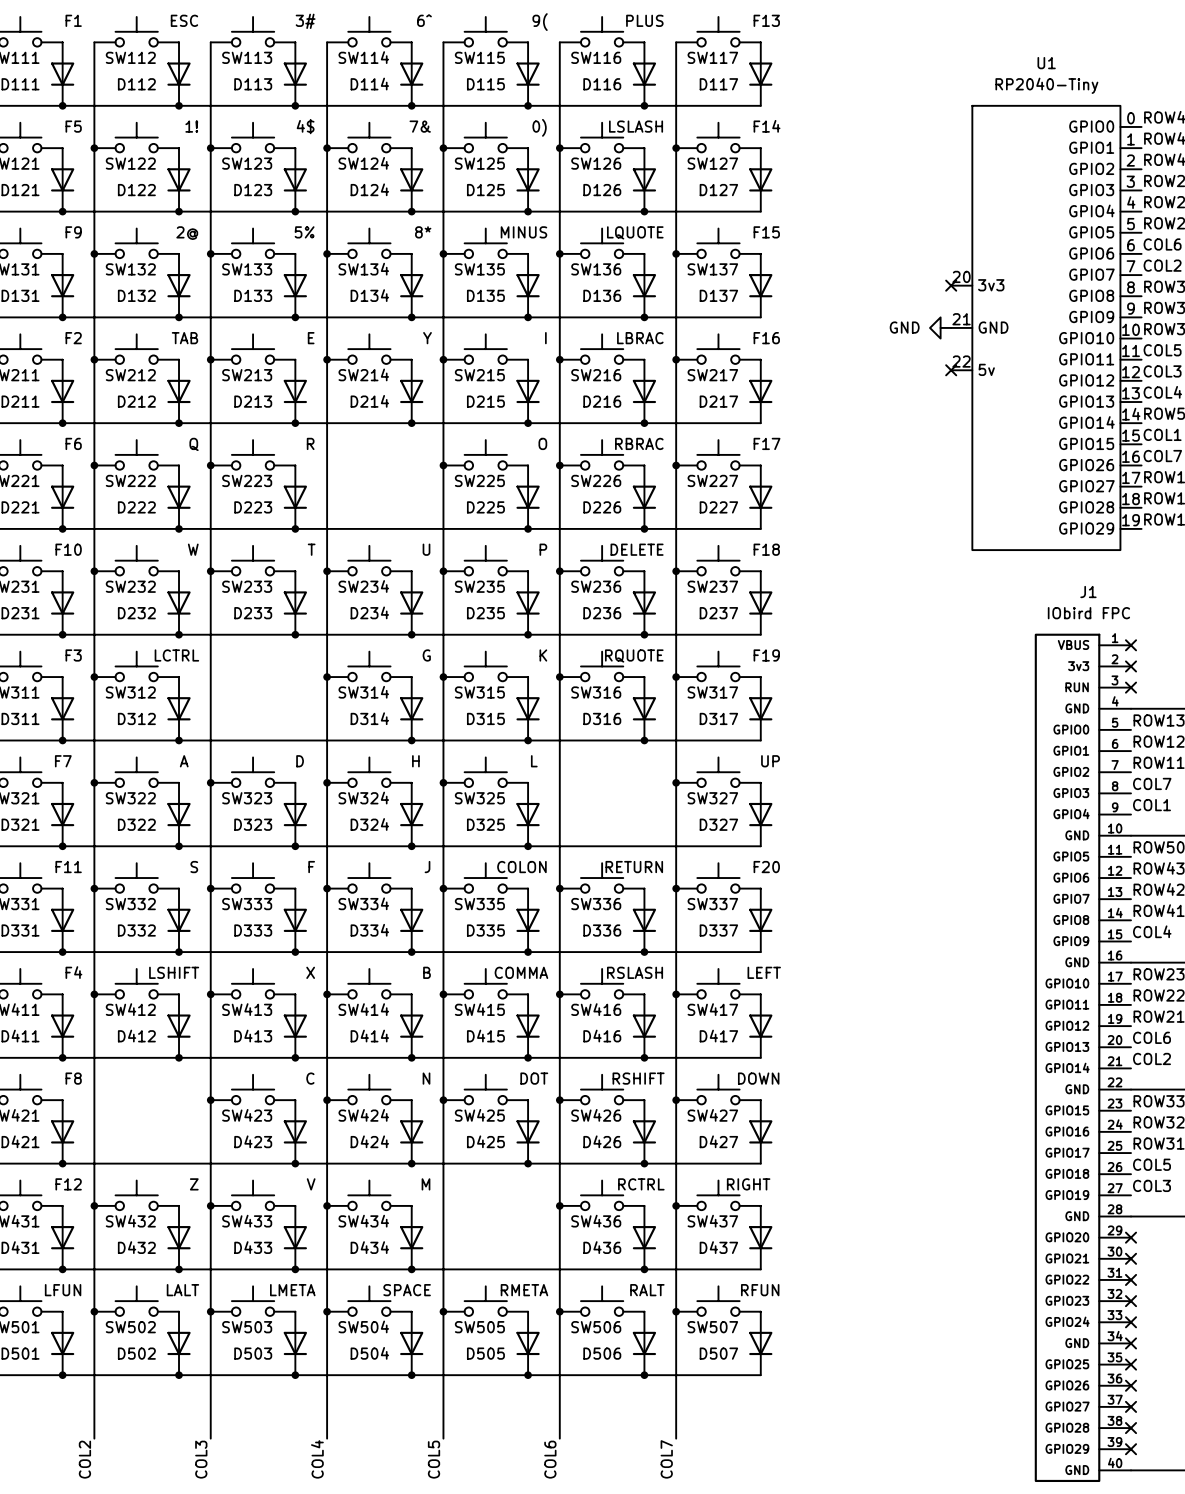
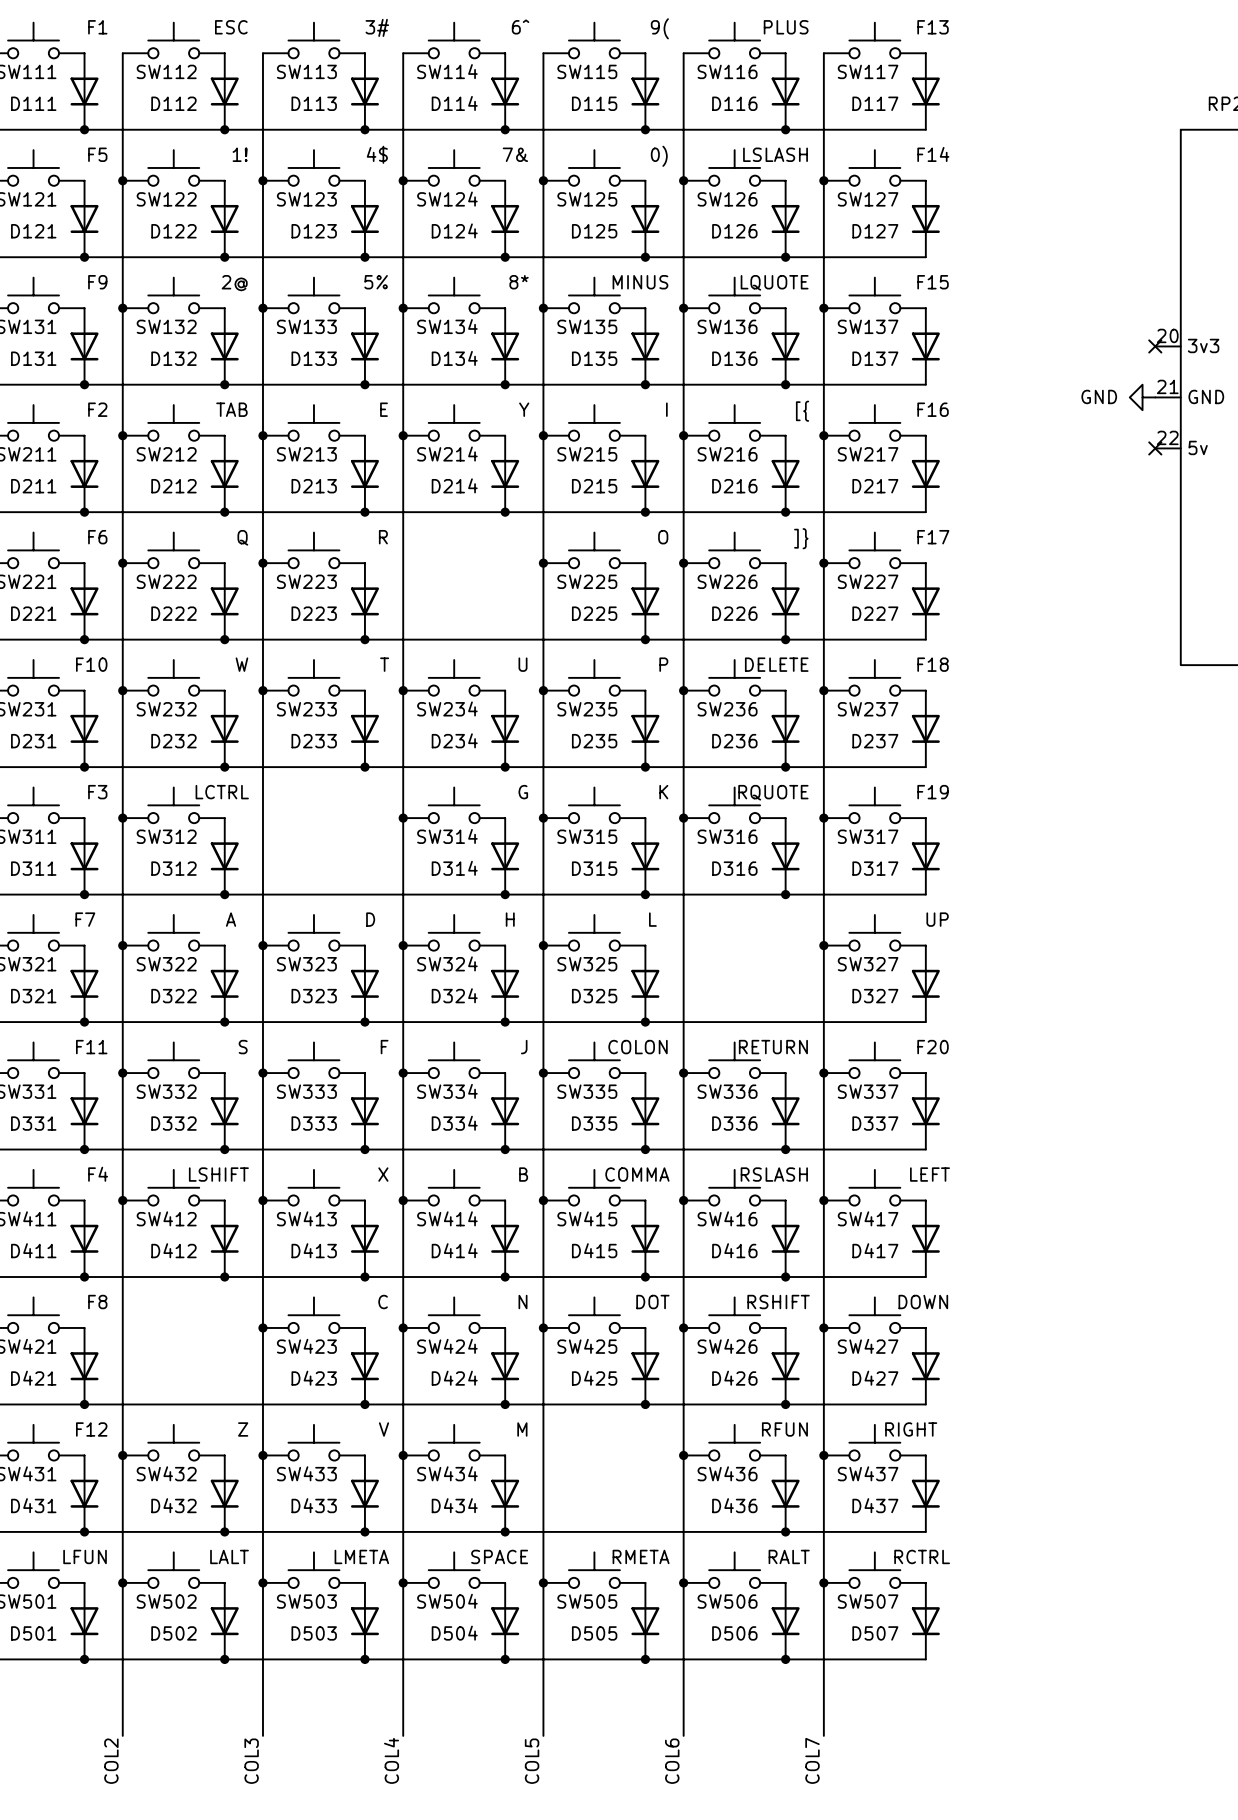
SW216 value: LBRAC (640, 338) -> [{ (802, 411)
SW226 value: RBRAC (639, 443) -> ]} (801, 538)
SW436 value: RCTRL (641, 1184) -> RFUN (784, 1429)
SW507 value: RFUN (760, 1290) -> RCTRL (922, 1556)

